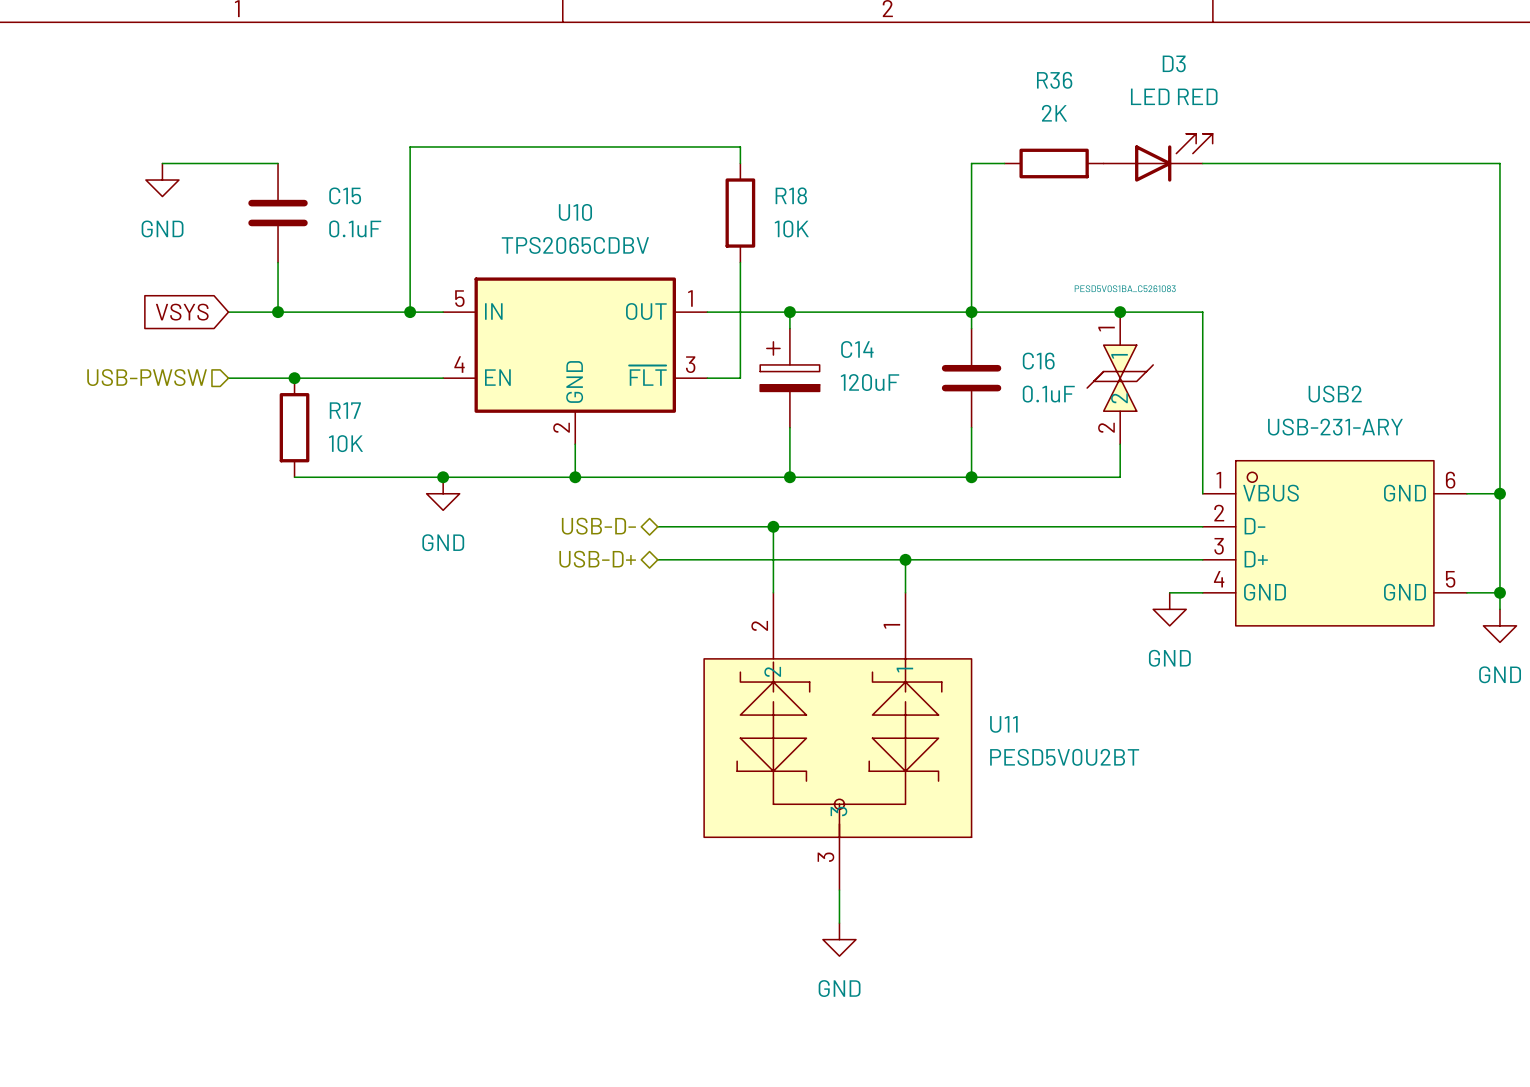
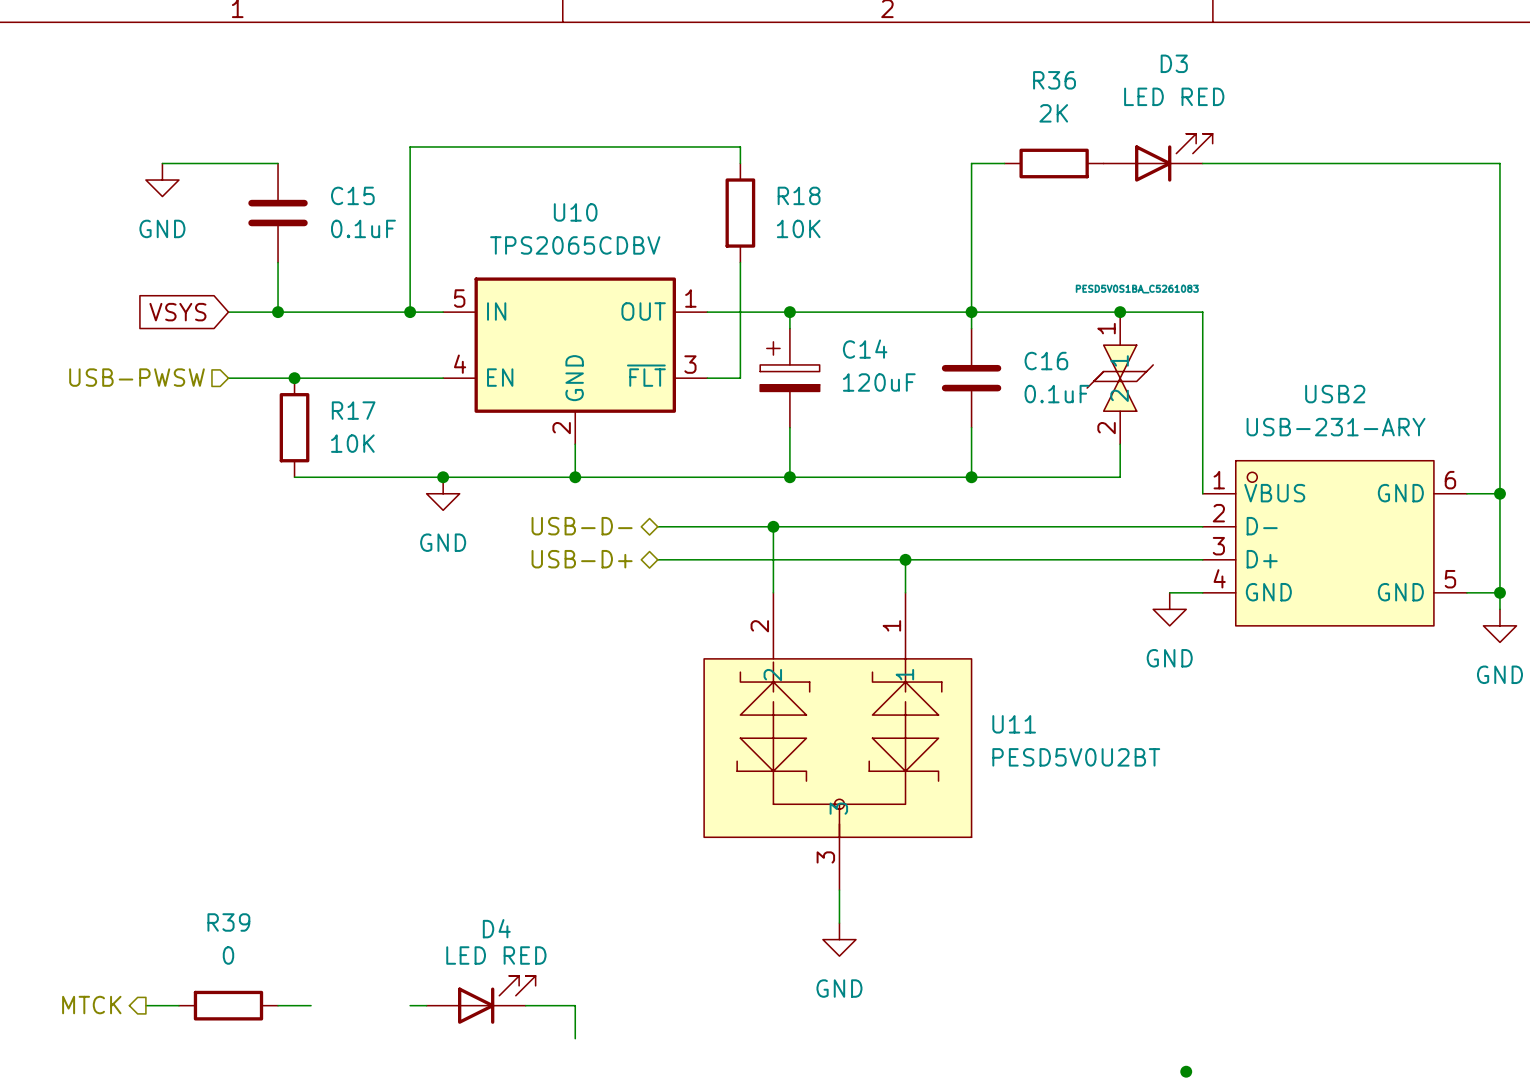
D4: none -> LED RED (481, 999)
hierarchical label: none -> MTCK (91, 1005)
wire: none -> (145, 1005) (178, 1005)
R39: none -> 0 (228, 1005)
wire: none -> (278, 1005) (311, 1005)
wire: none -> (410, 1005) (426, 1005)
wire: none -> (525, 1005) (575, 1005) (575, 1038)
junction: none -> (1186, 1071)

